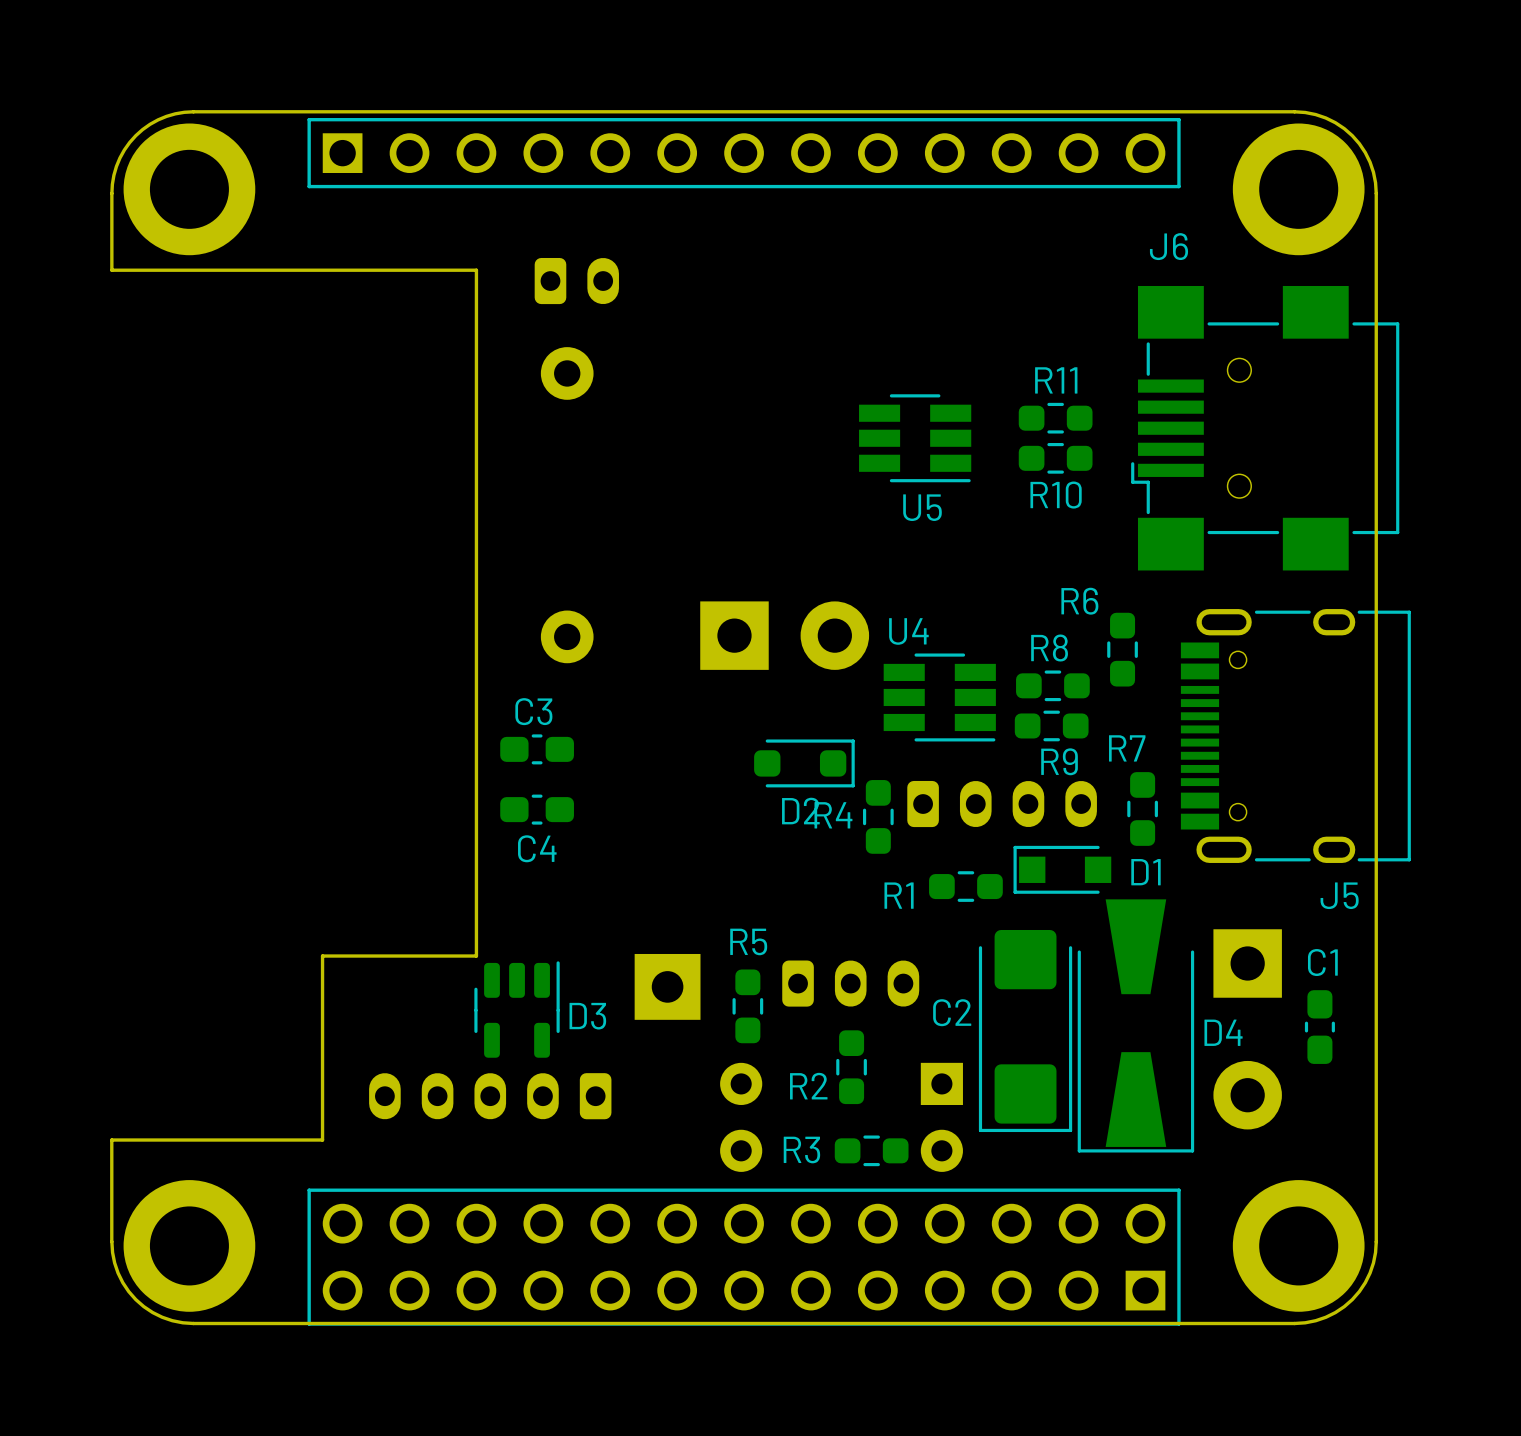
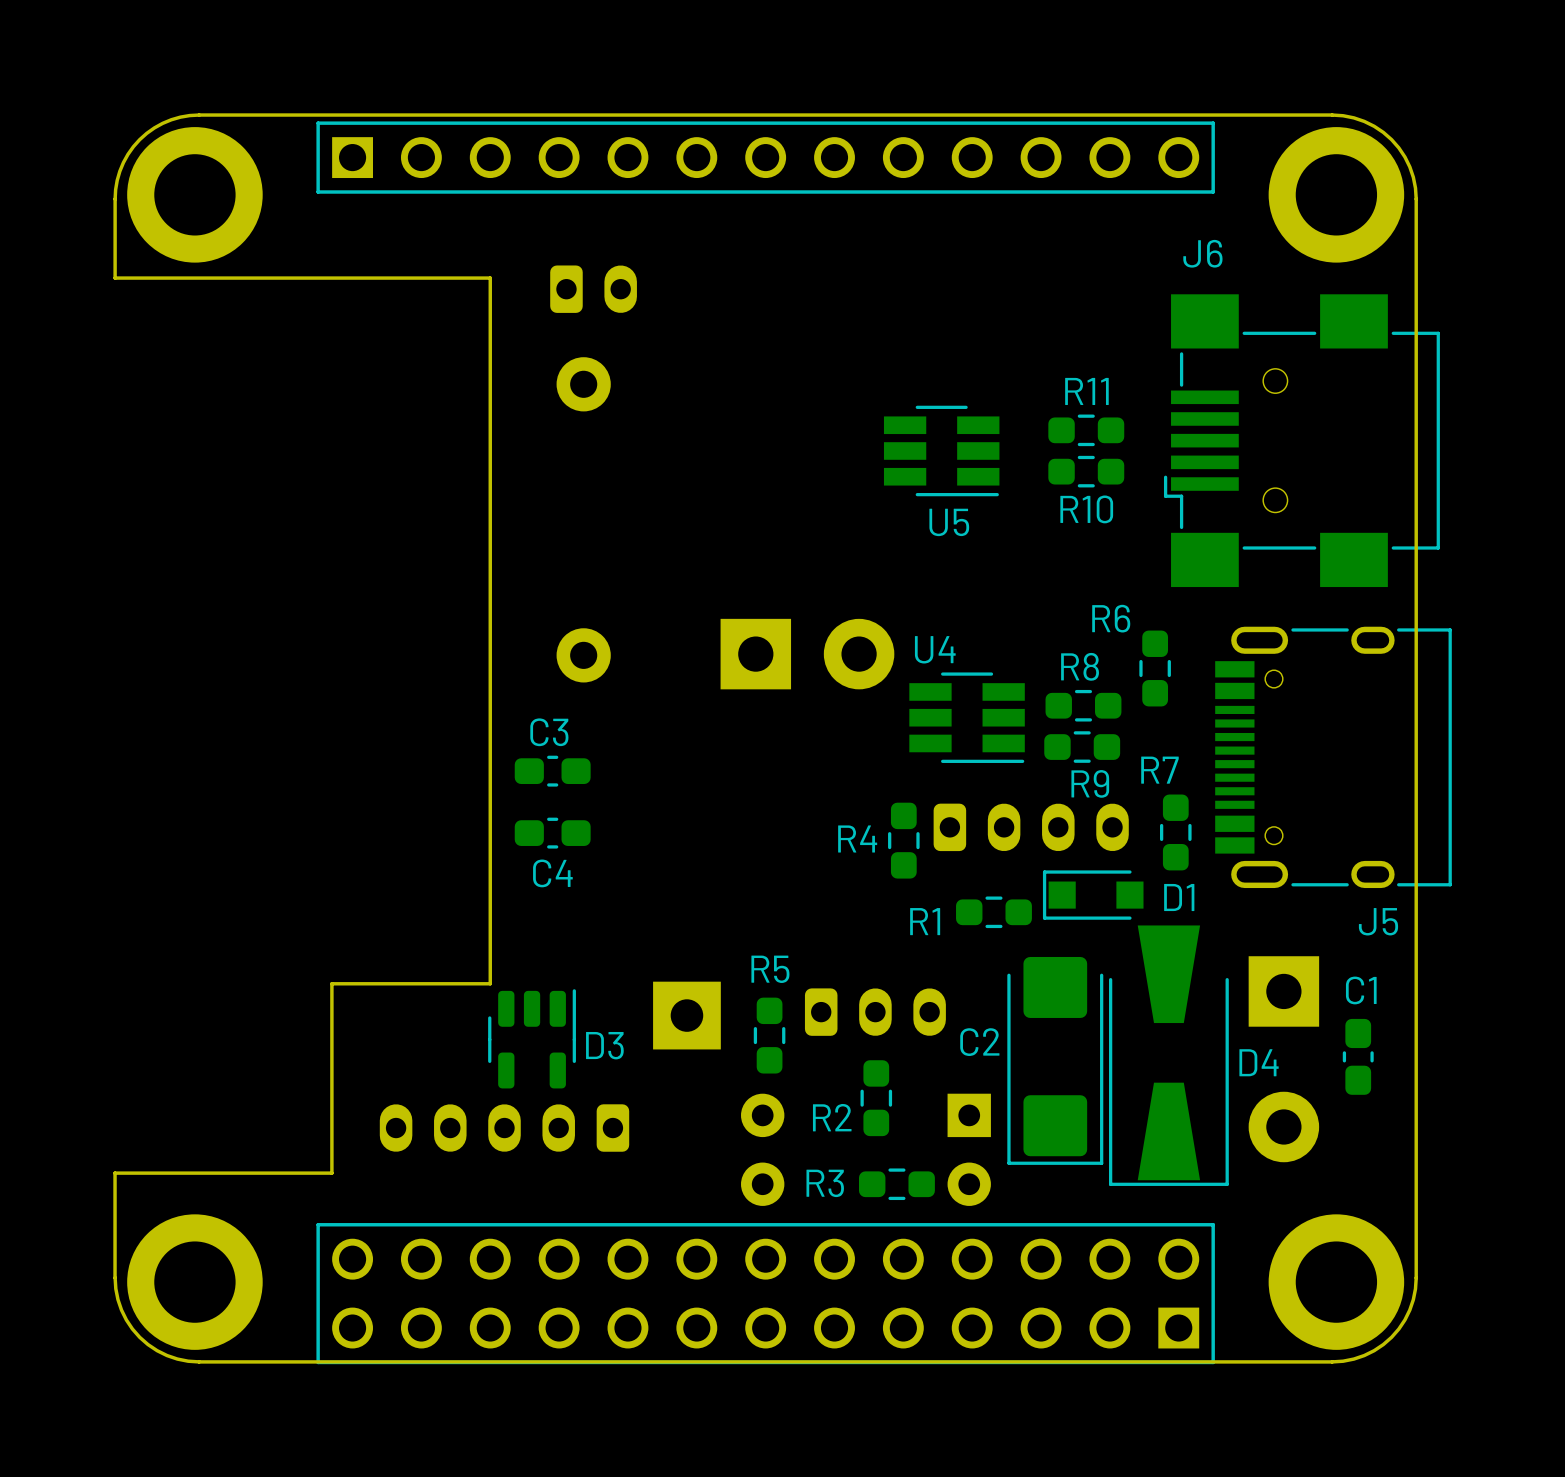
D2: (804, 763) -> none

